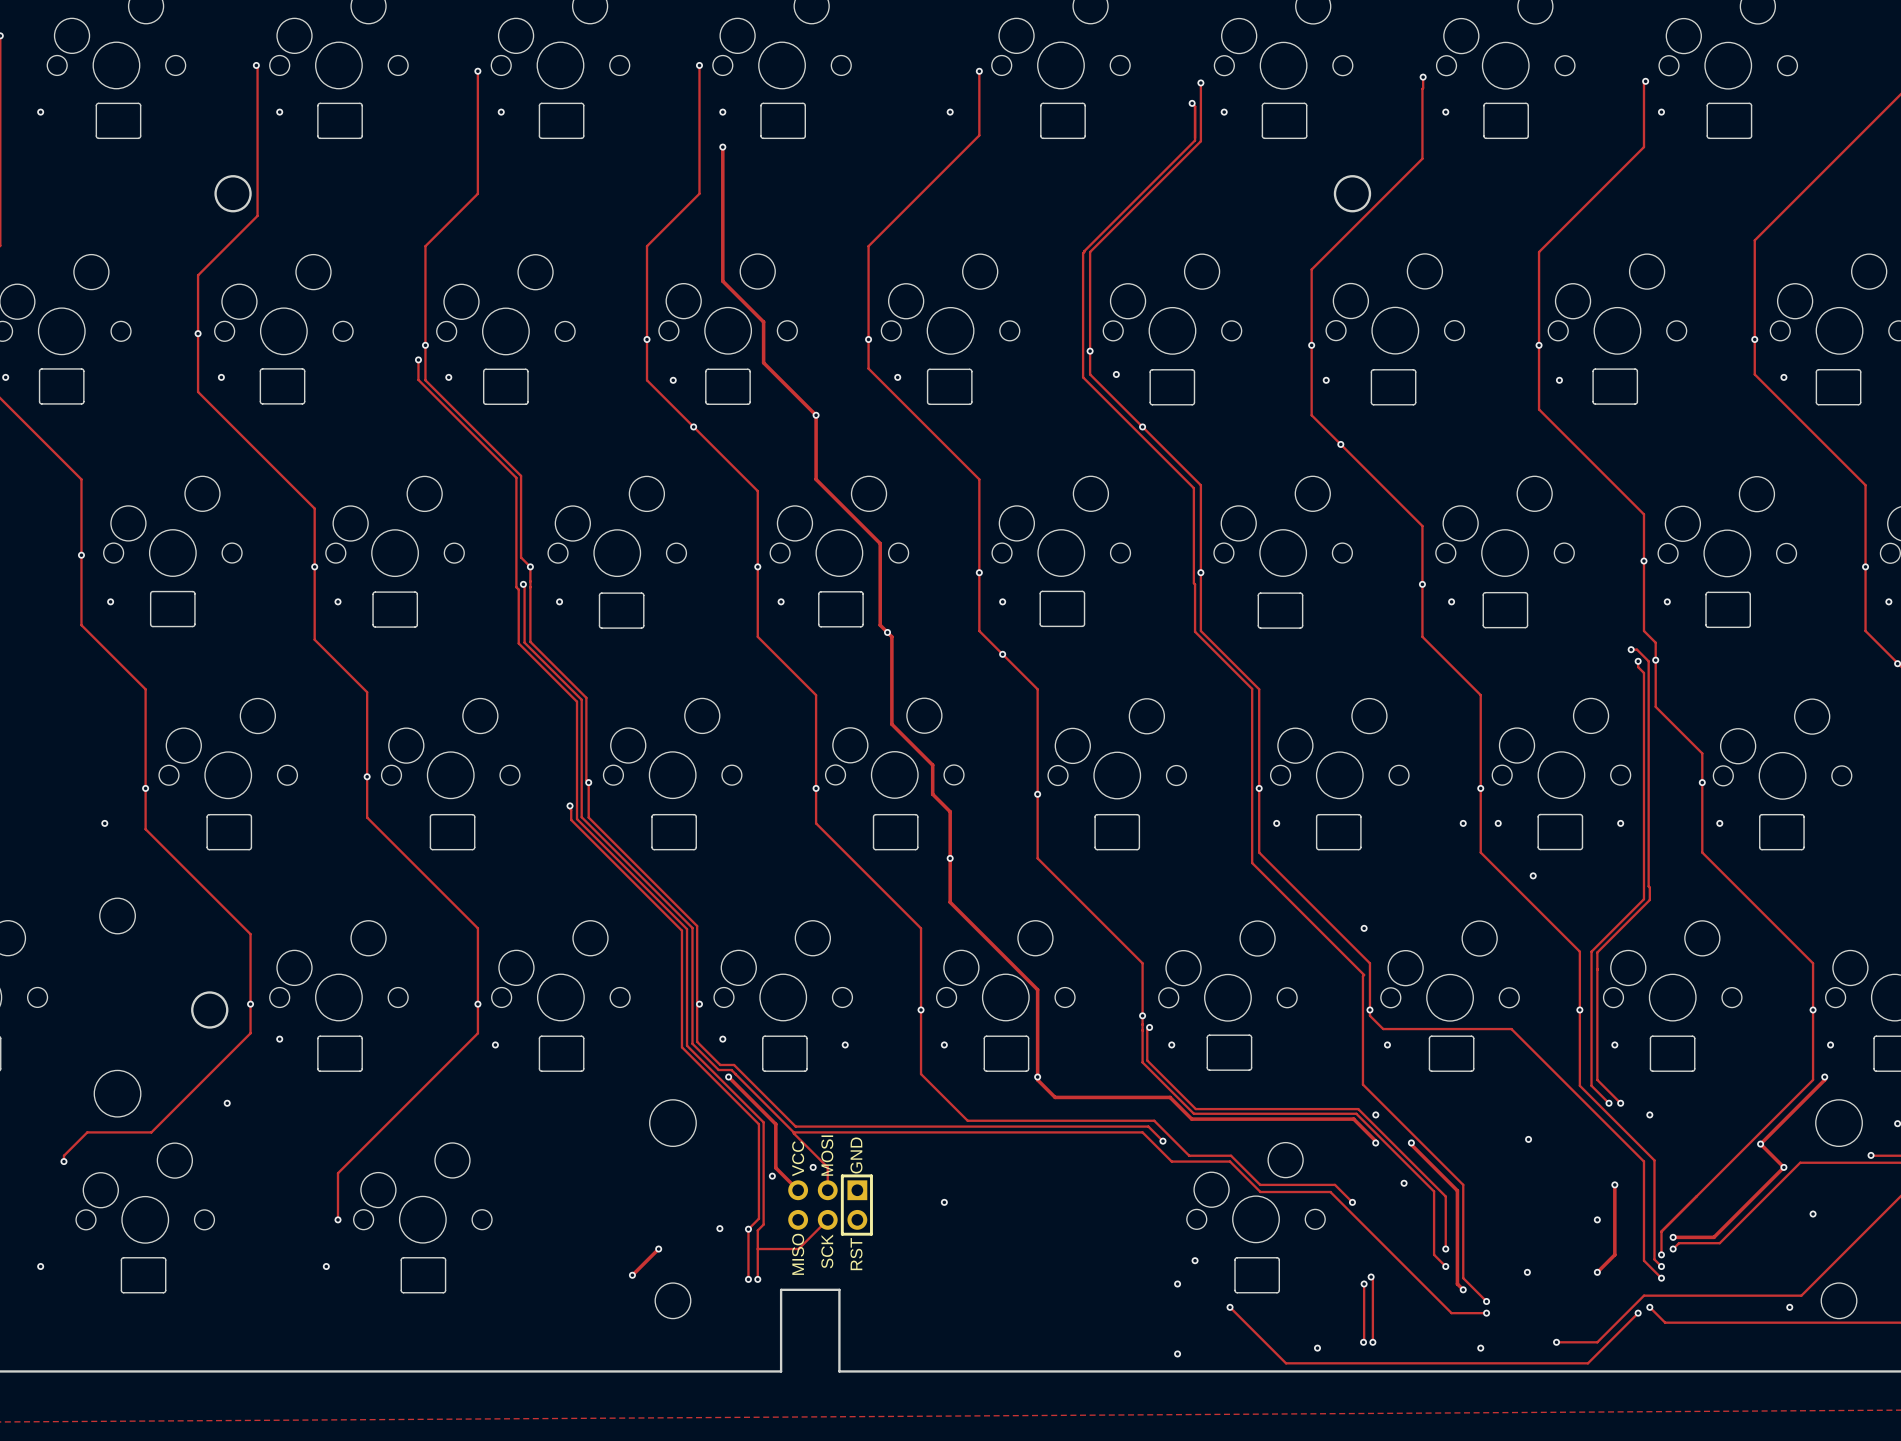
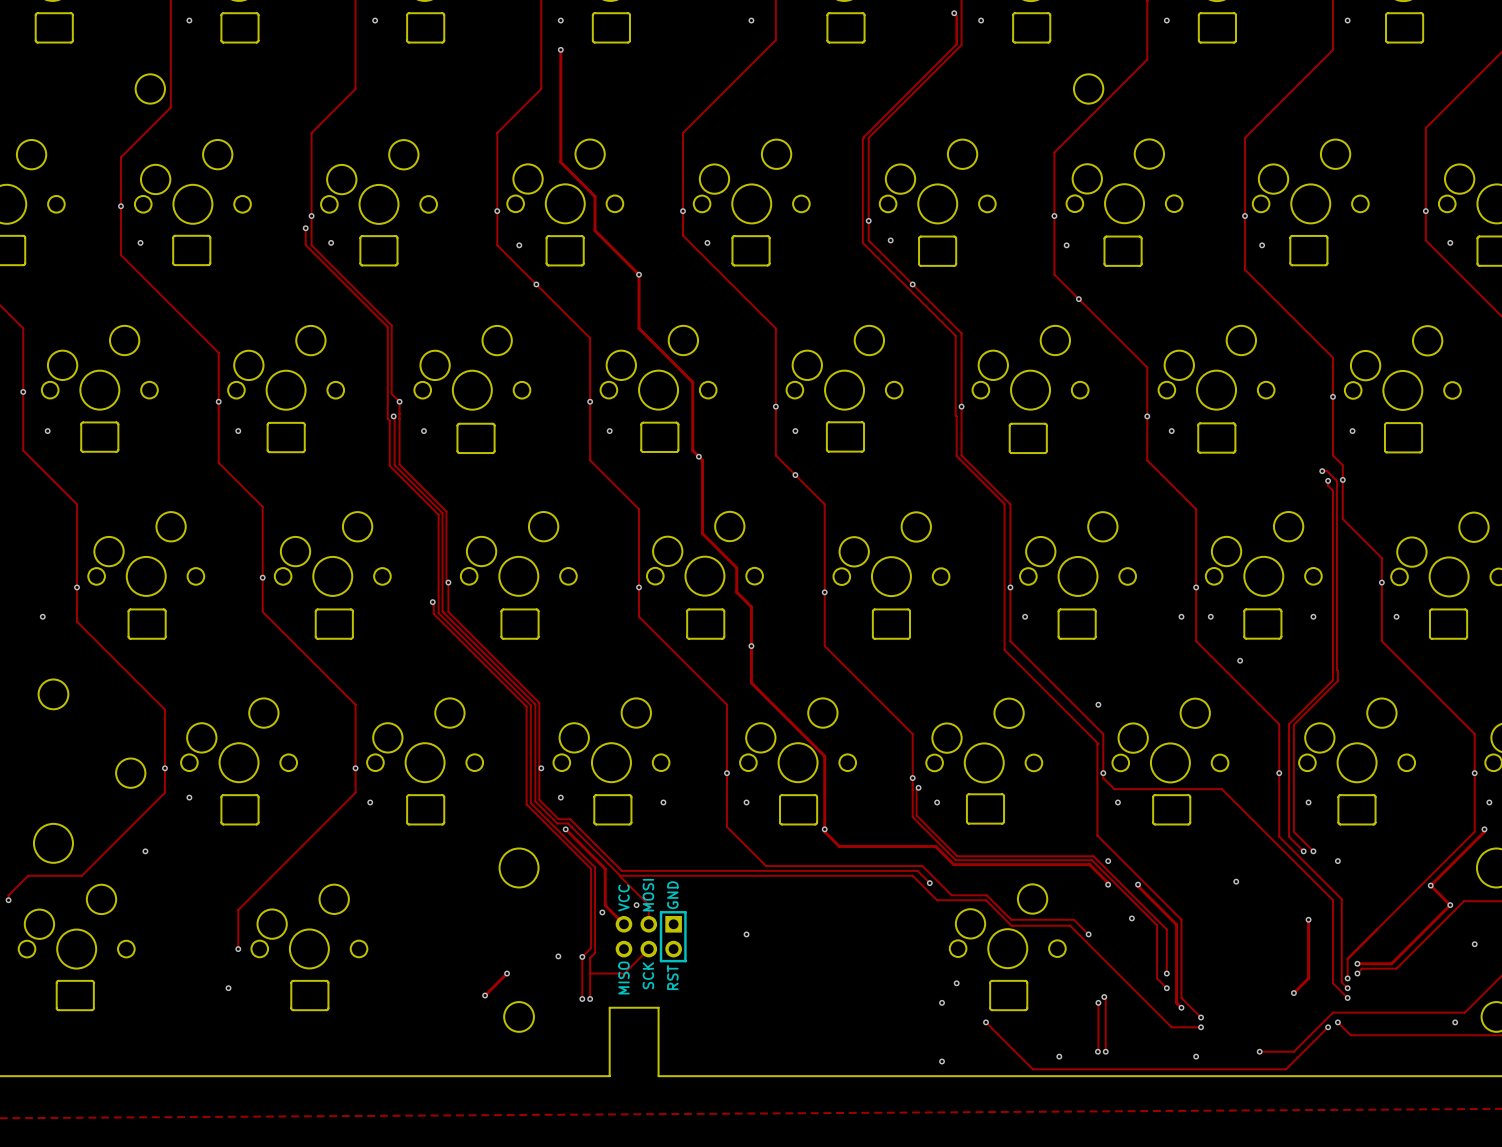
via: (1597, 1219) -> none
via: (1527, 1272) -> none

